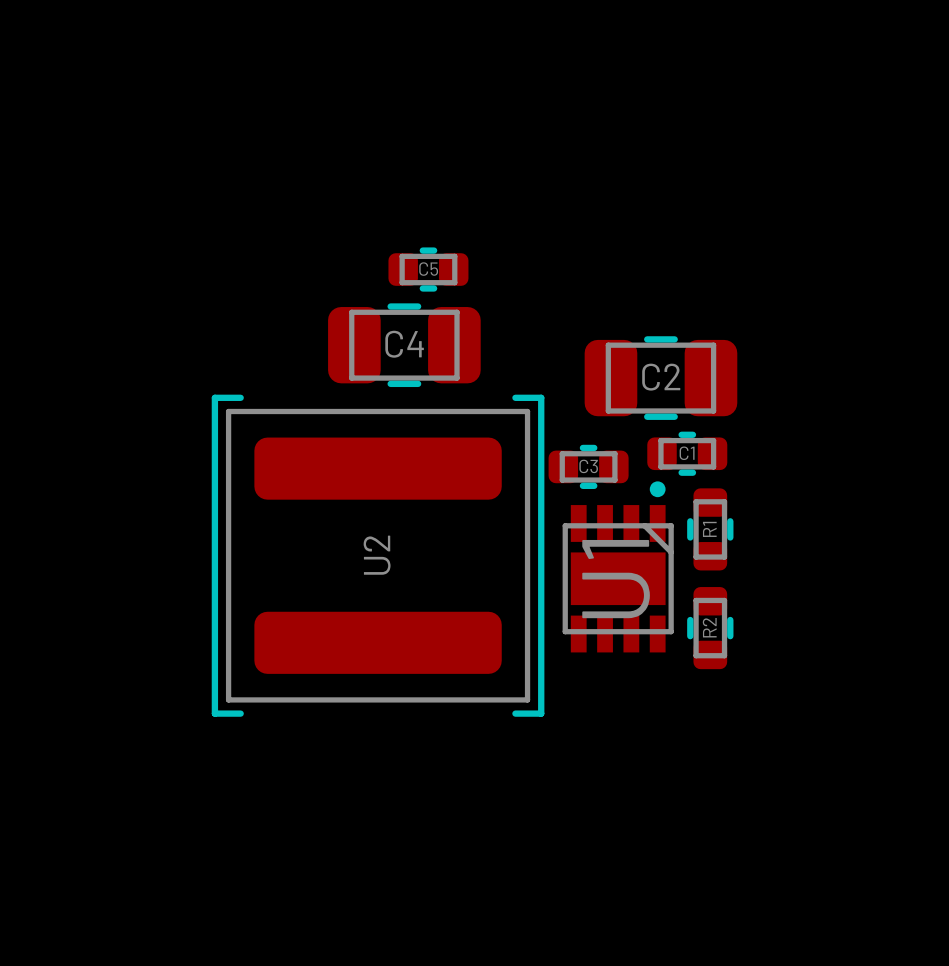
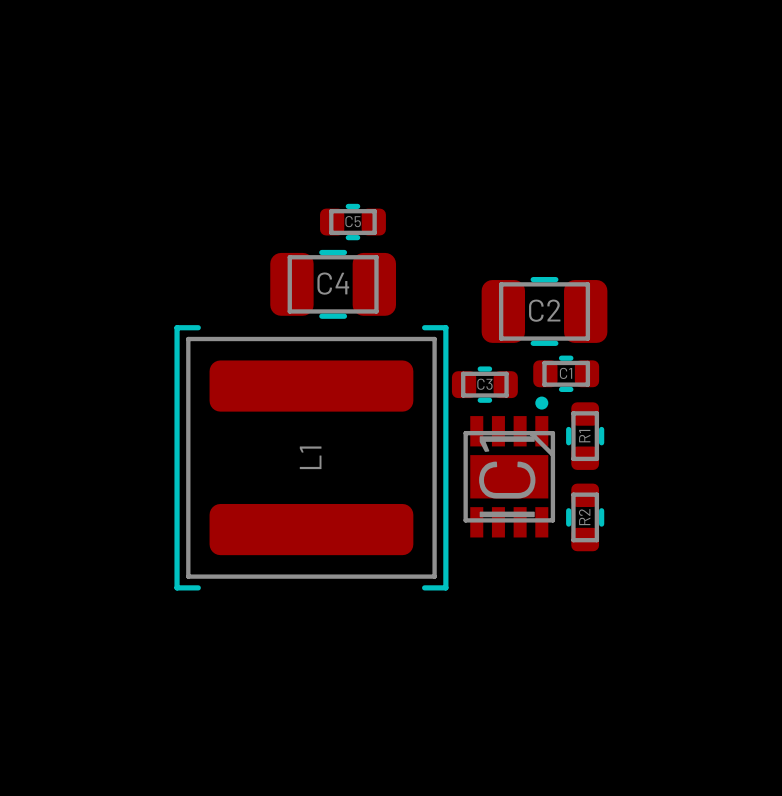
U2 name: U2 (377, 555) -> L1 (310, 457)
U1 name: U1 (616, 579) -> IC1 (507, 476)

